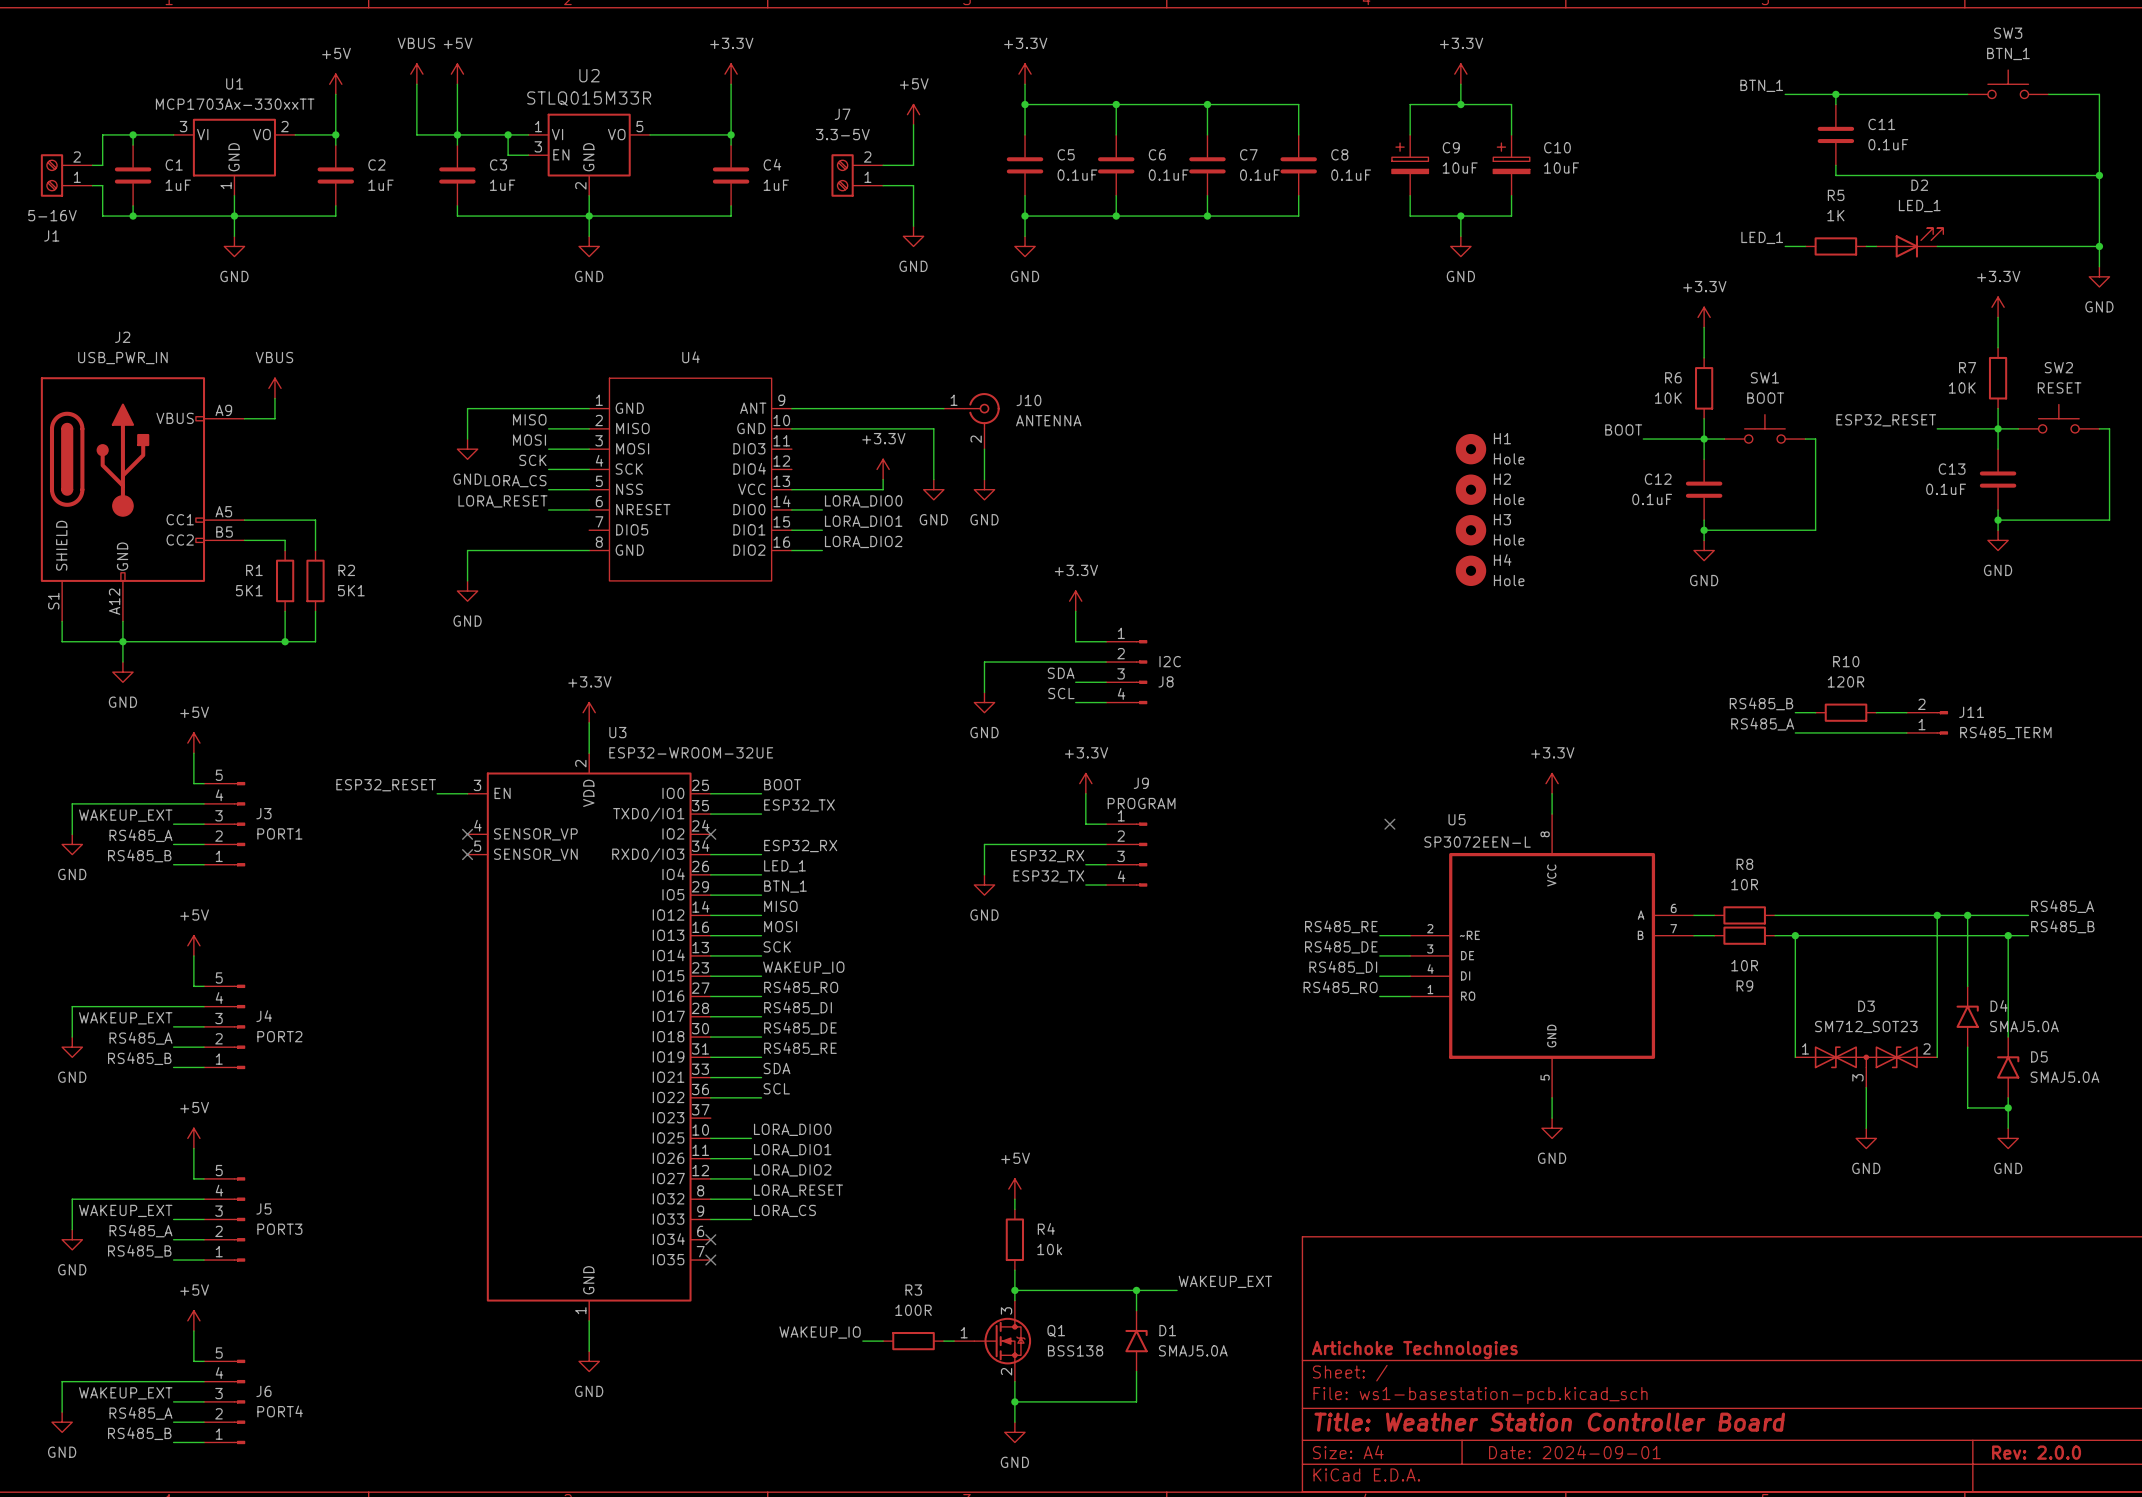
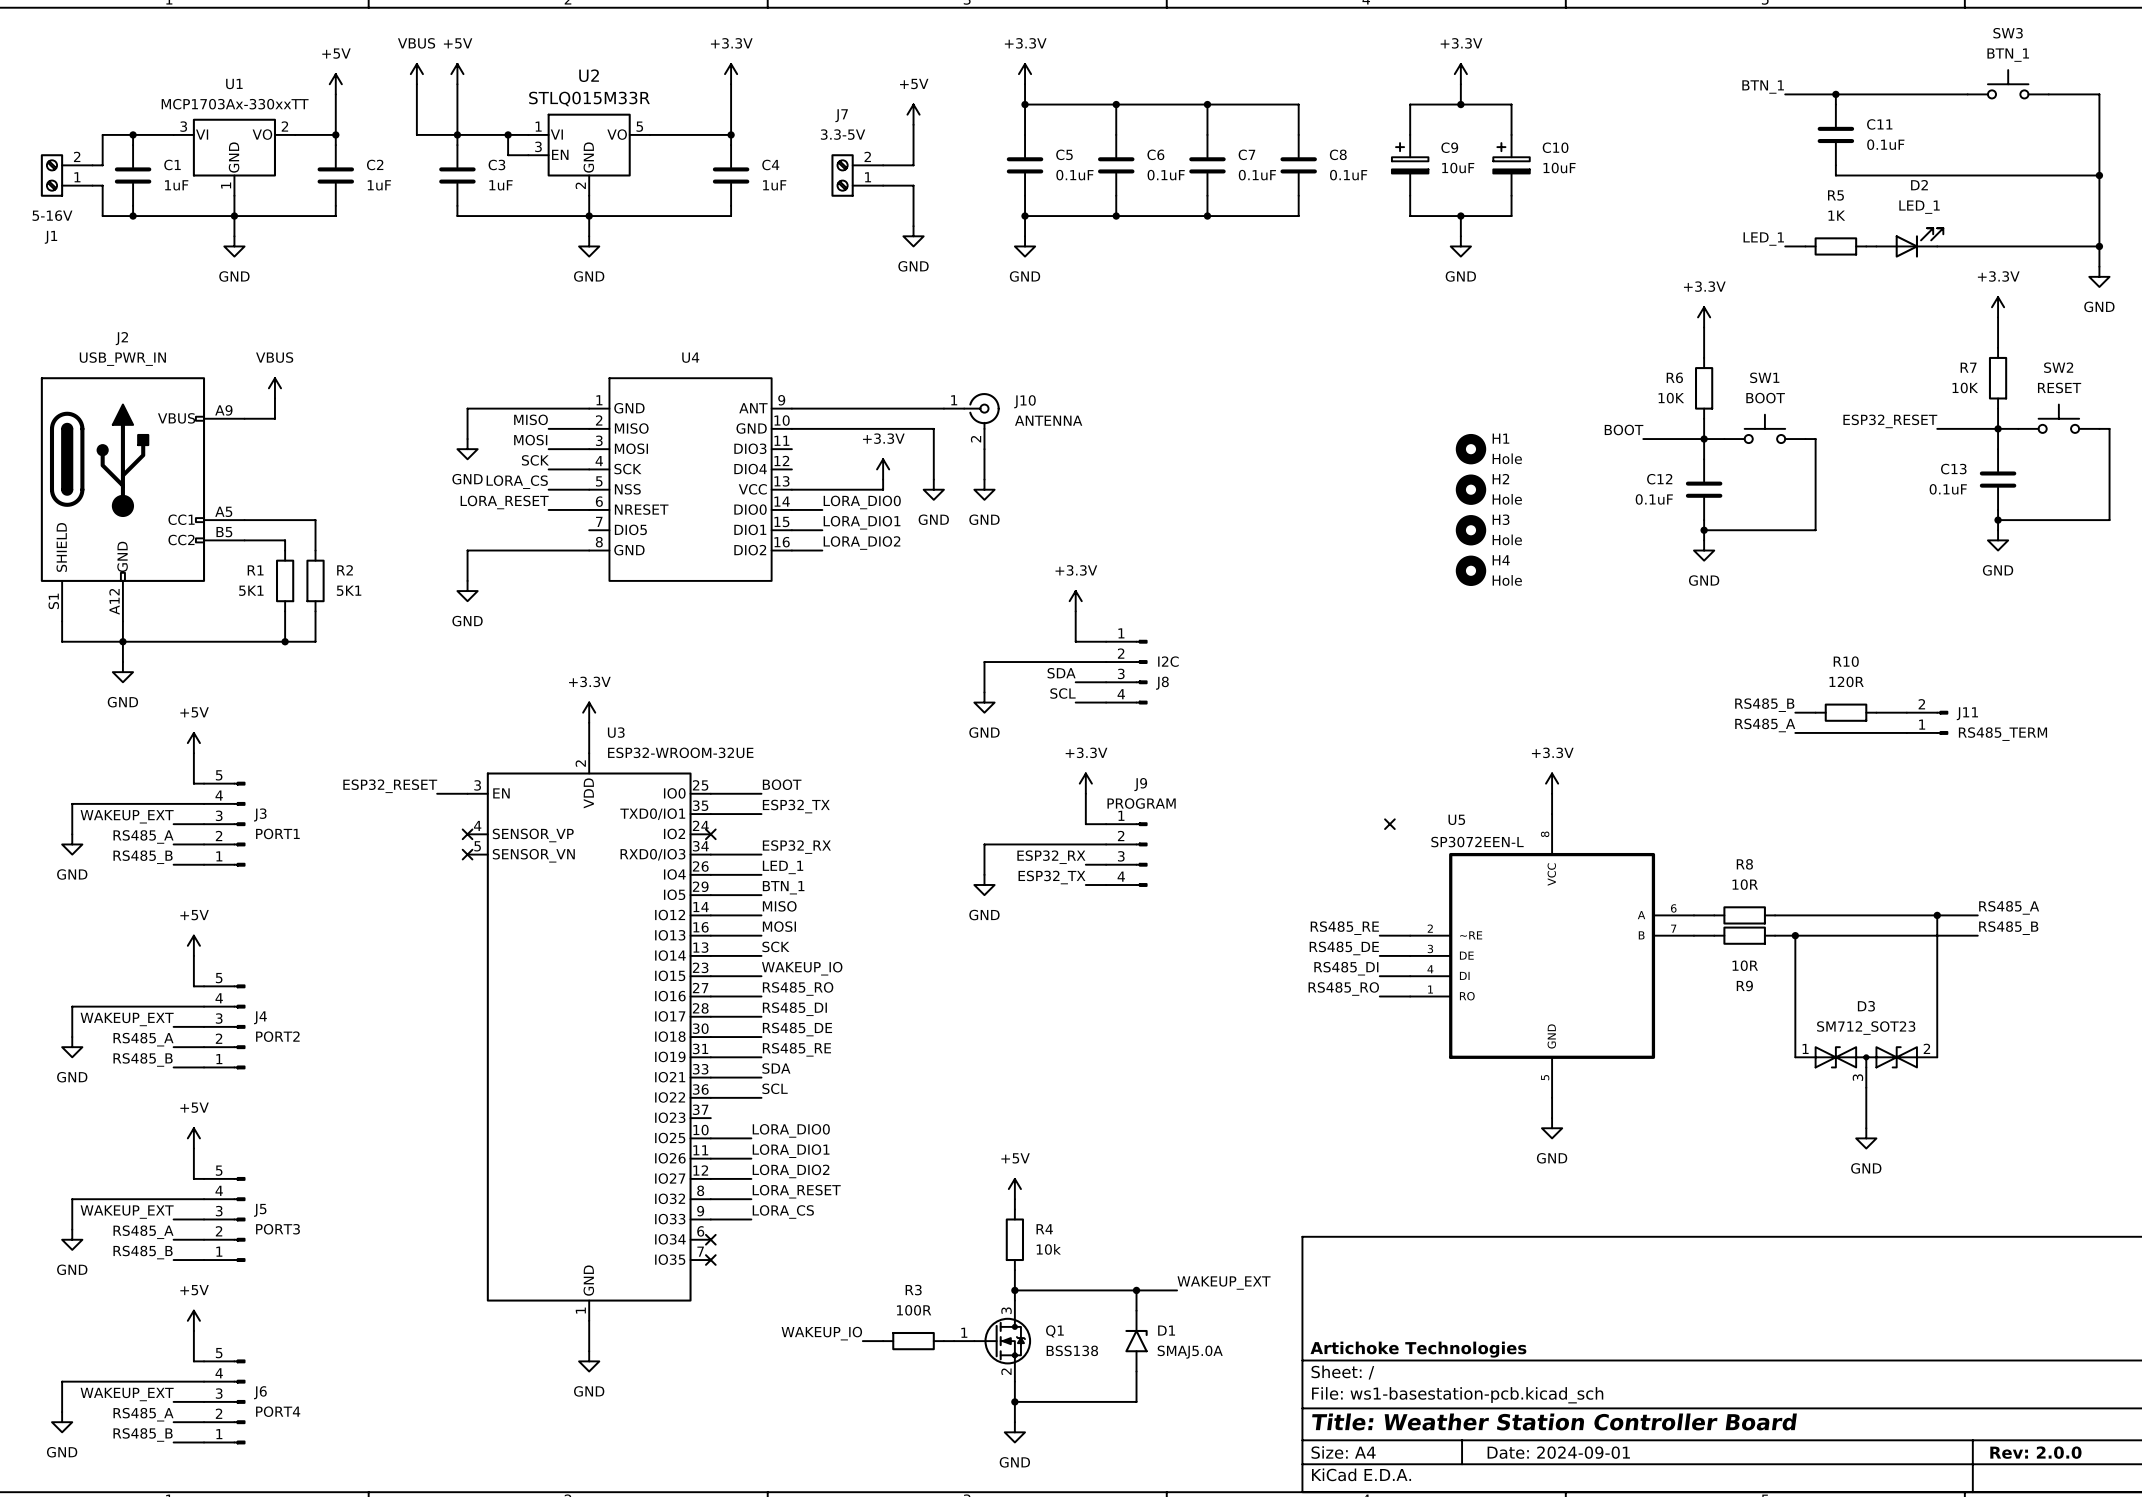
label position: RS485_A (2062, 906) -> RS485_A (2009, 907)
wire: (1967, 915) (1967, 986) -> none
junction: (1967, 915) -> none
wire: (1977, 915) (2028, 915) -> none
label position: RS485_B (2062, 926) -> RS485_B (2008, 928)
wire: (1977, 935) (2028, 935) -> none
wire: (2008, 935) (2008, 1037) -> none
junction: (2008, 935) -> none
D4: SMAJ5.0A (1967, 1016) -> none
wire: (1967, 1047) (1967, 1107) (2008, 1107) -> none
D5: SMAJ5.0A (2008, 1067) -> none
wire: (2008, 1097) (2008, 1128) -> none
junction: (2008, 1107) -> none
power symbol: GND (2008, 1138) -> none

